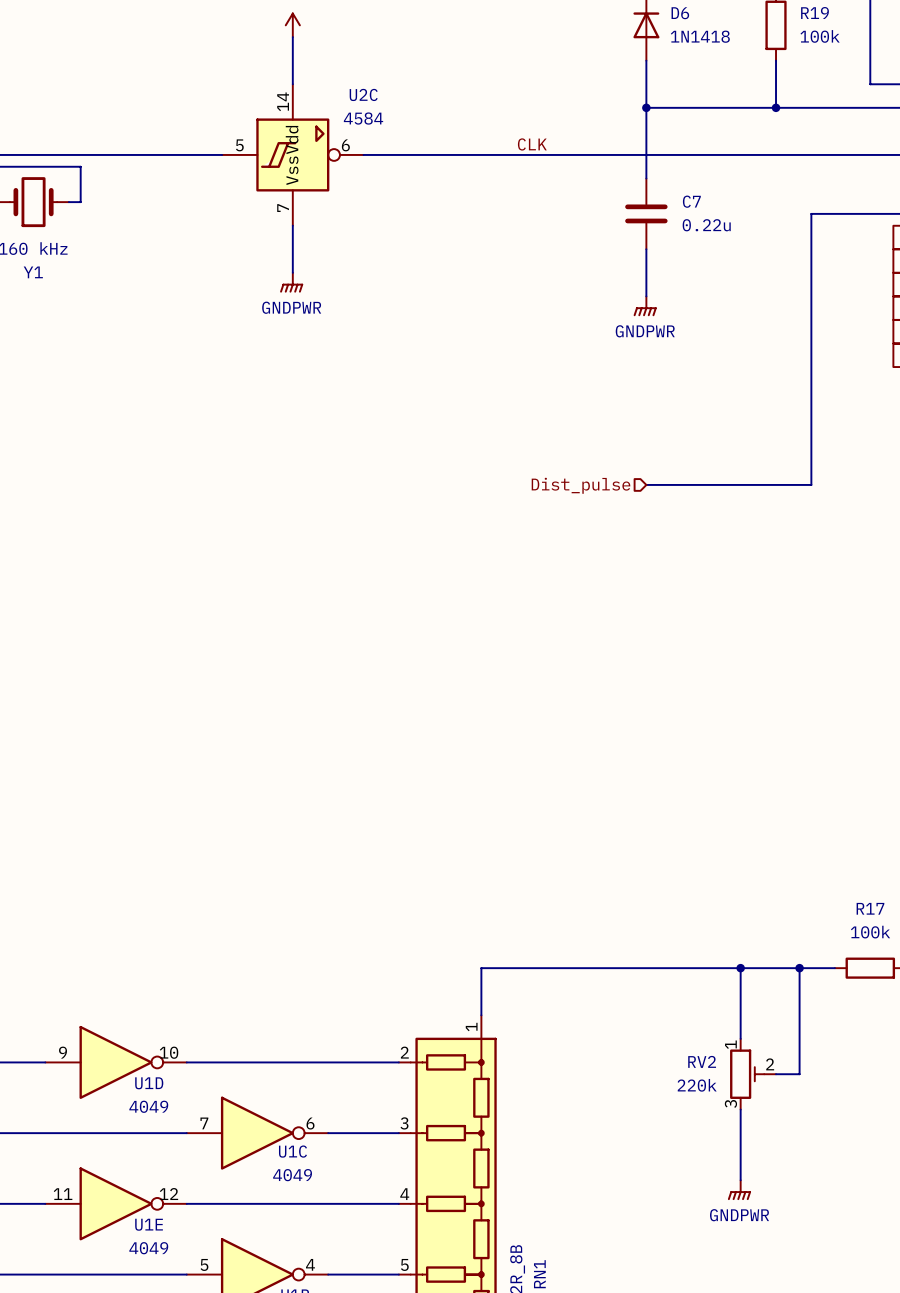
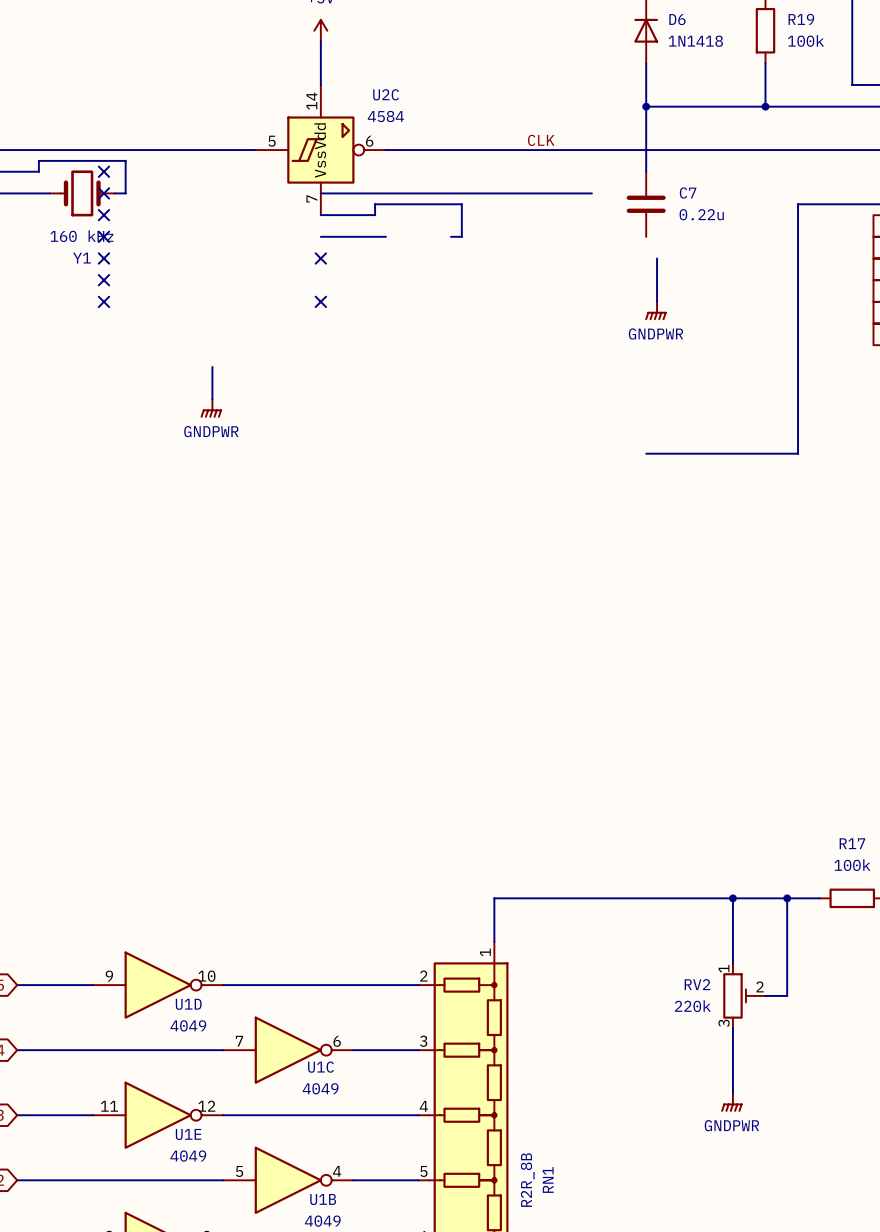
no-connect mark: none -> (103, 171)
no-connect mark: none -> (103, 193)
wire: none -> (320, 193) (591, 193)
no-connect mark: none -> (103, 215)
wire: (292, 225) (292, 272) -> (320, 215) (375, 215) (375, 204) (461, 204) (461, 236) (450, 236)
no-connect mark: none -> (103, 236)
wire: none -> (320, 236) (385, 236)
wire: (646, 249) (646, 296) -> (657, 258) (657, 301)
no-connect mark: none -> (103, 258)
no-connect mark: none -> (320, 258)
power symbol: GNDPWR (291, 282) -> none
no-connect mark: none -> (103, 280)
power symbol position: GNDPWR (645, 306) -> GNDPWR (655, 310)
no-connect mark: none -> (103, 301)
no-connect mark: none -> (320, 301)
wire: none -> (212, 366) (212, 399)
power symbol: none -> GNDPWR (211, 408)
hierarchical label: Dist_pulse (580, 485) -> none

